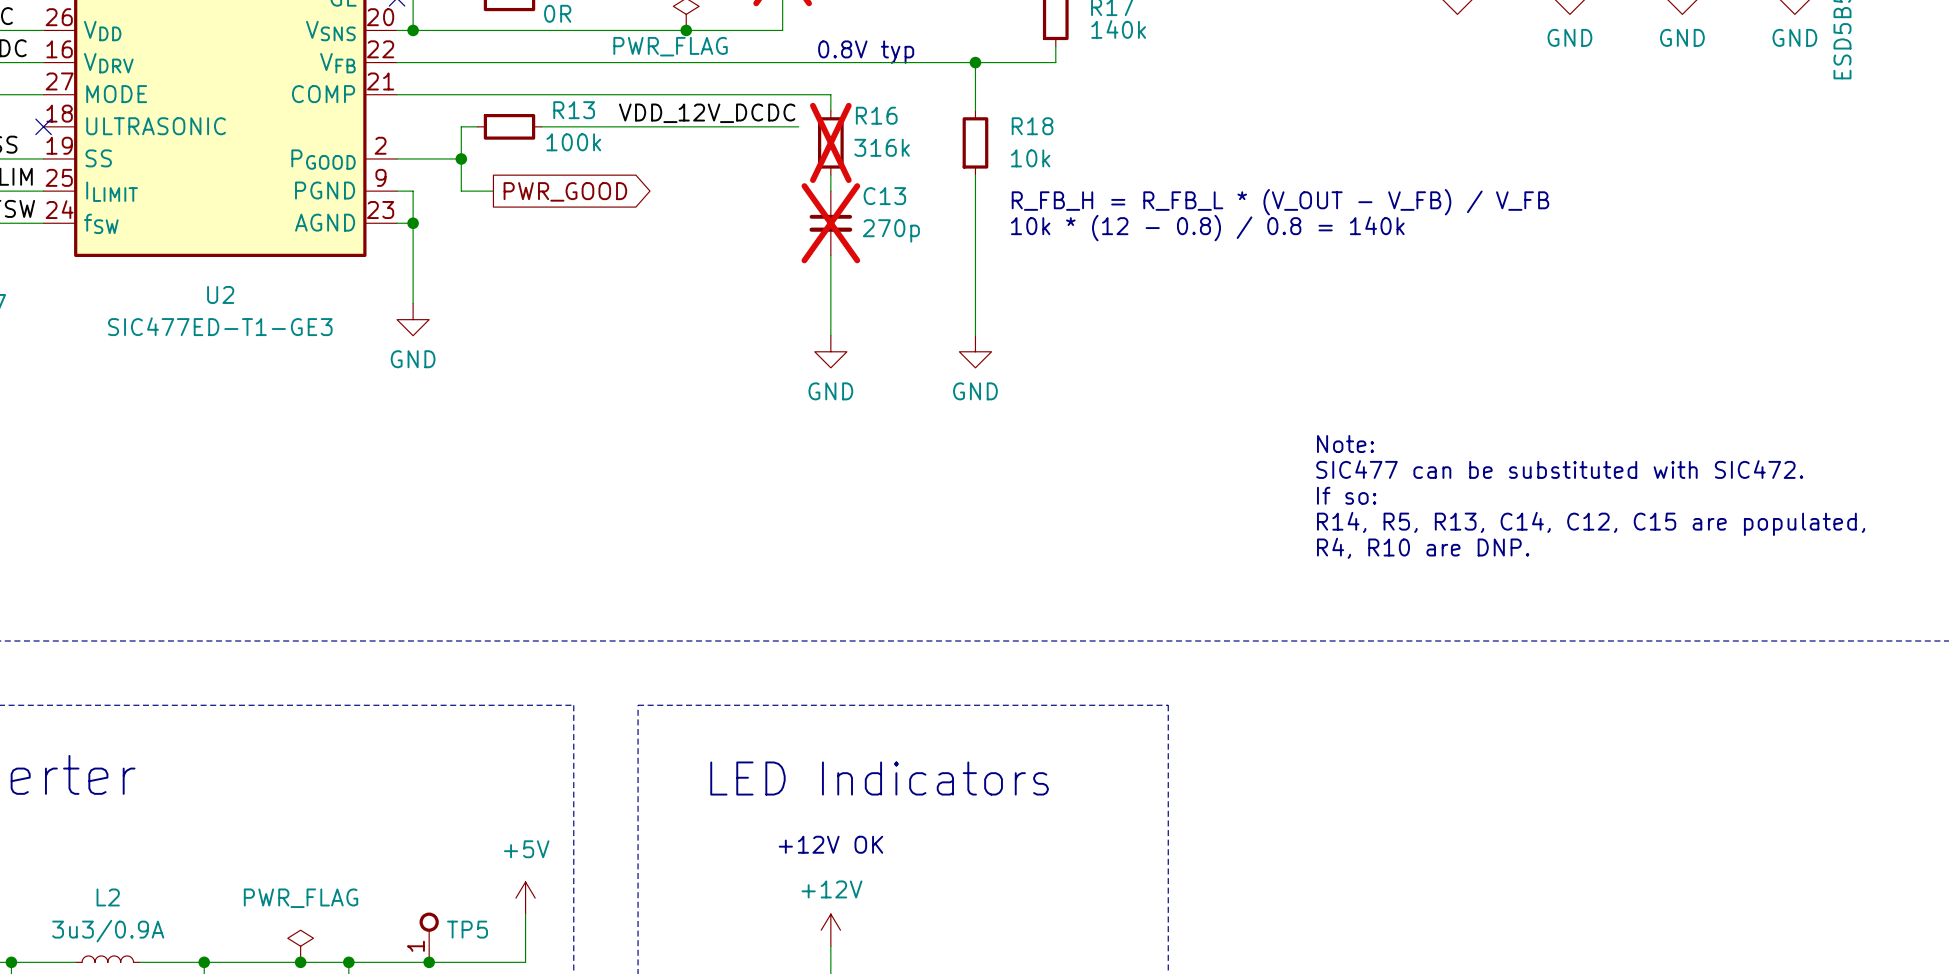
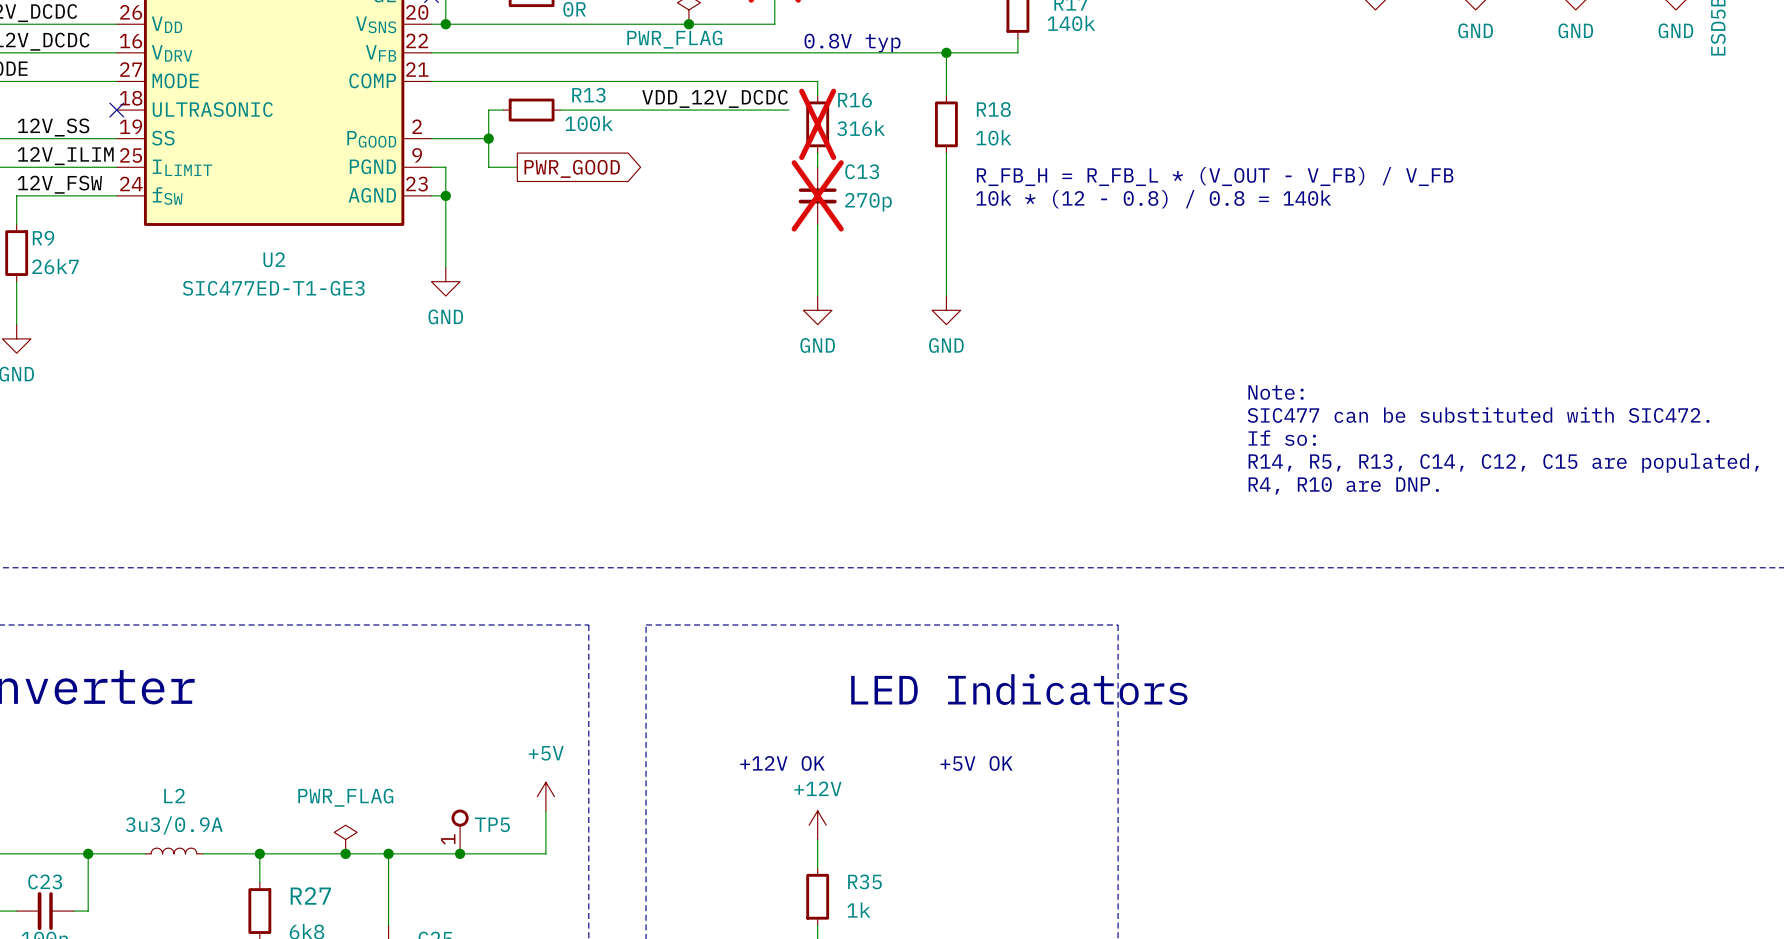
text position: LED Indicators (879, 778) -> LED Indicators (1019, 689)
text position: +12V OK (830, 844) -> +12V OK (782, 763)
text: none -> +5V OK (976, 763)

